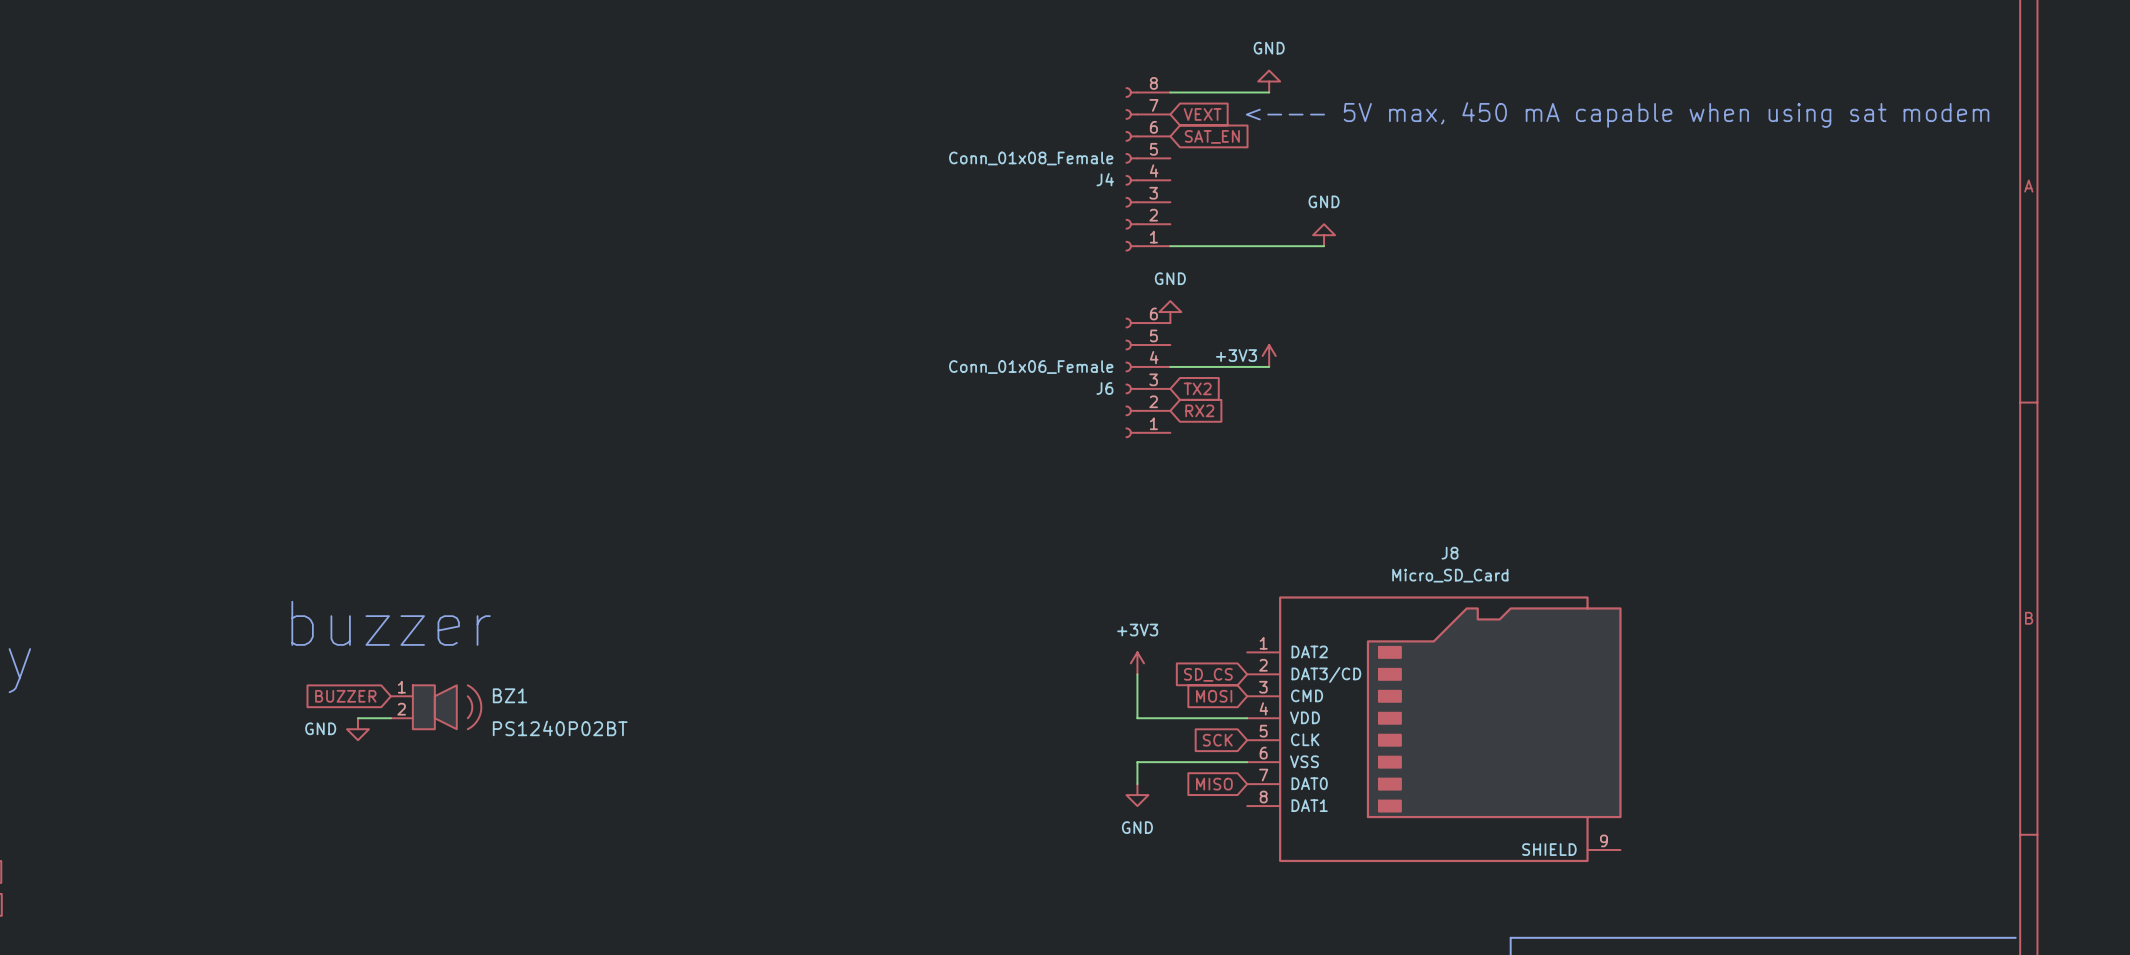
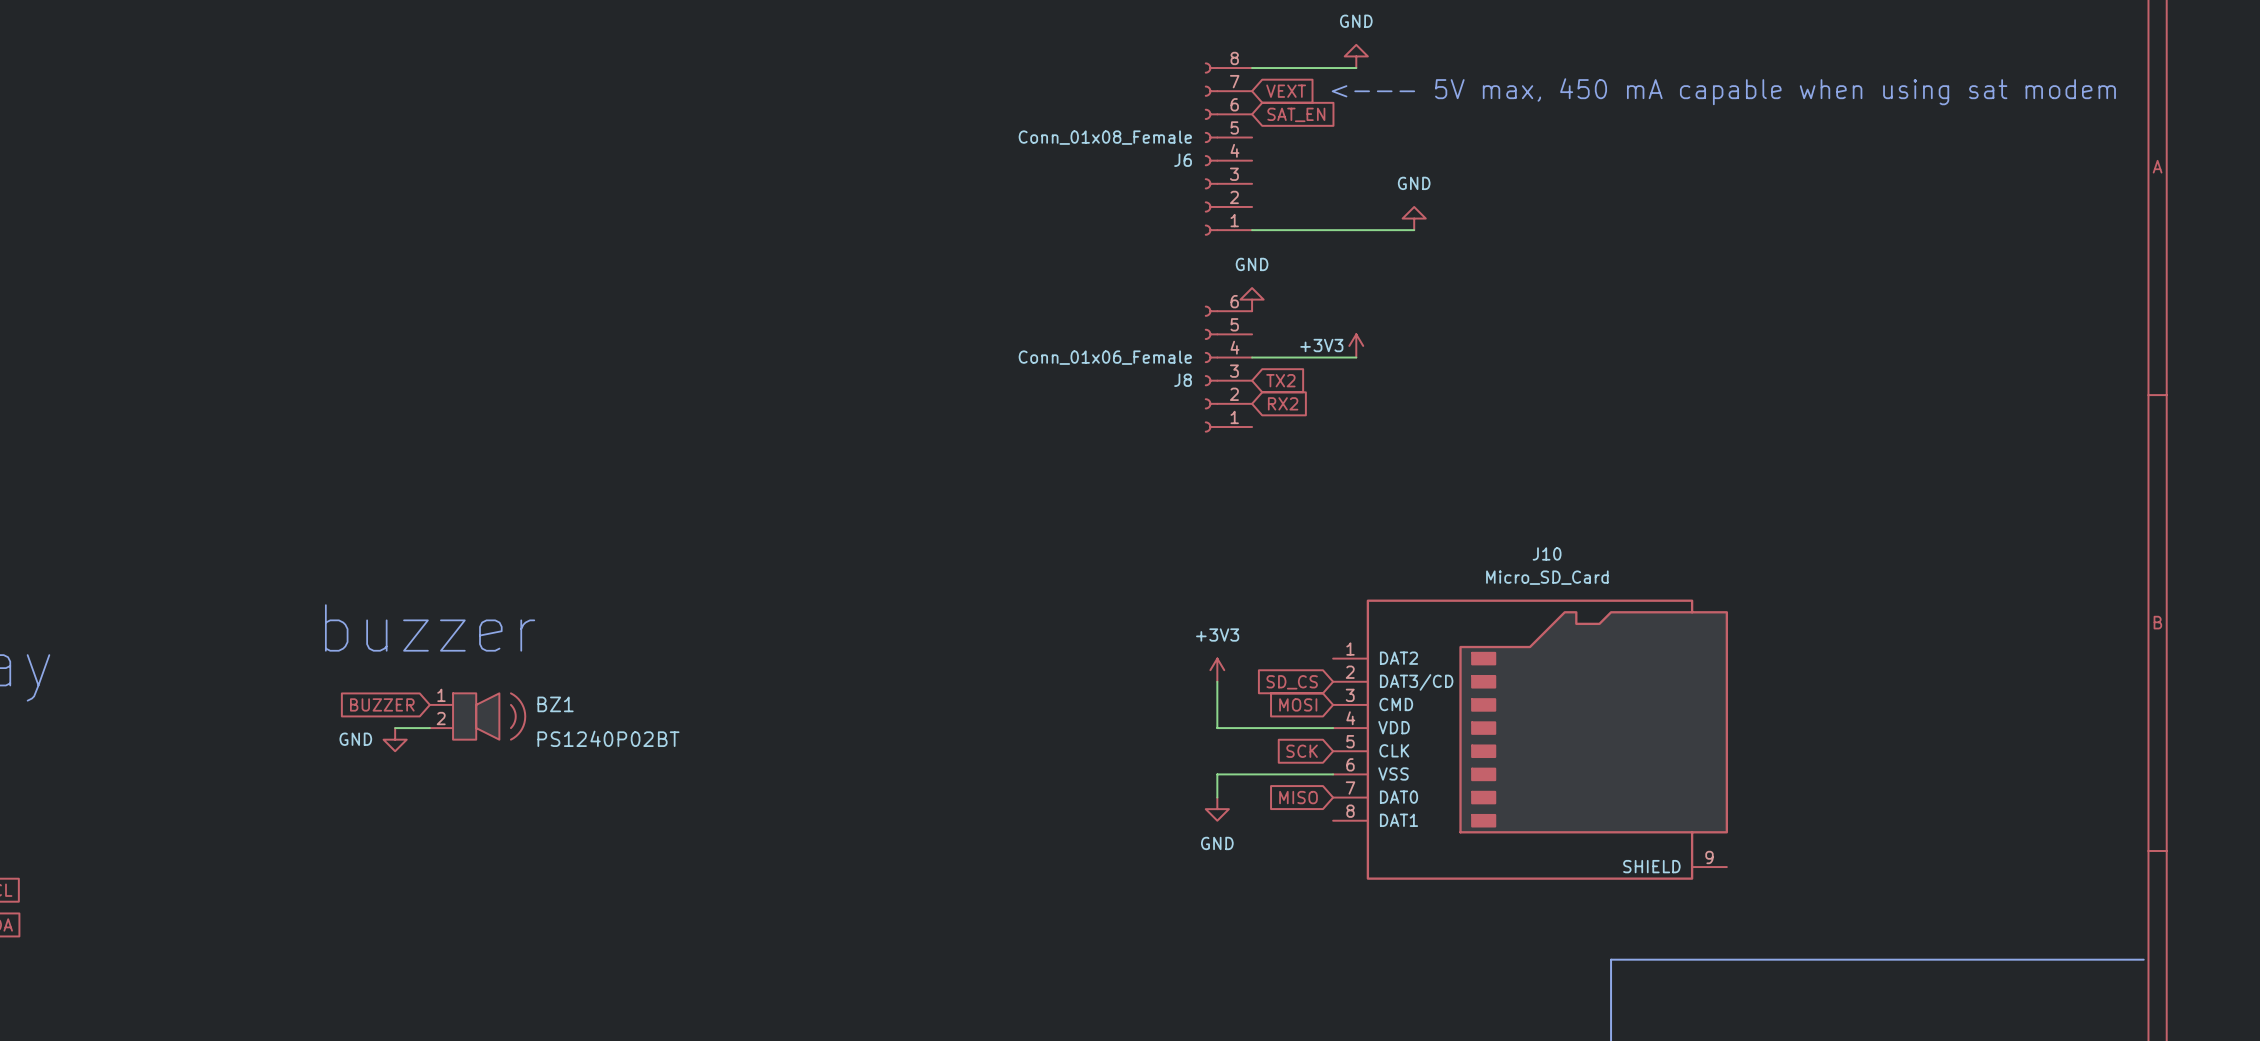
J4 name: J4 (1105, 179) -> J6 (1183, 160)
J6 name: J6 (1104, 388) -> J8 (1183, 380)
J8 name: J8 (1450, 553) -> J10 (1547, 553)

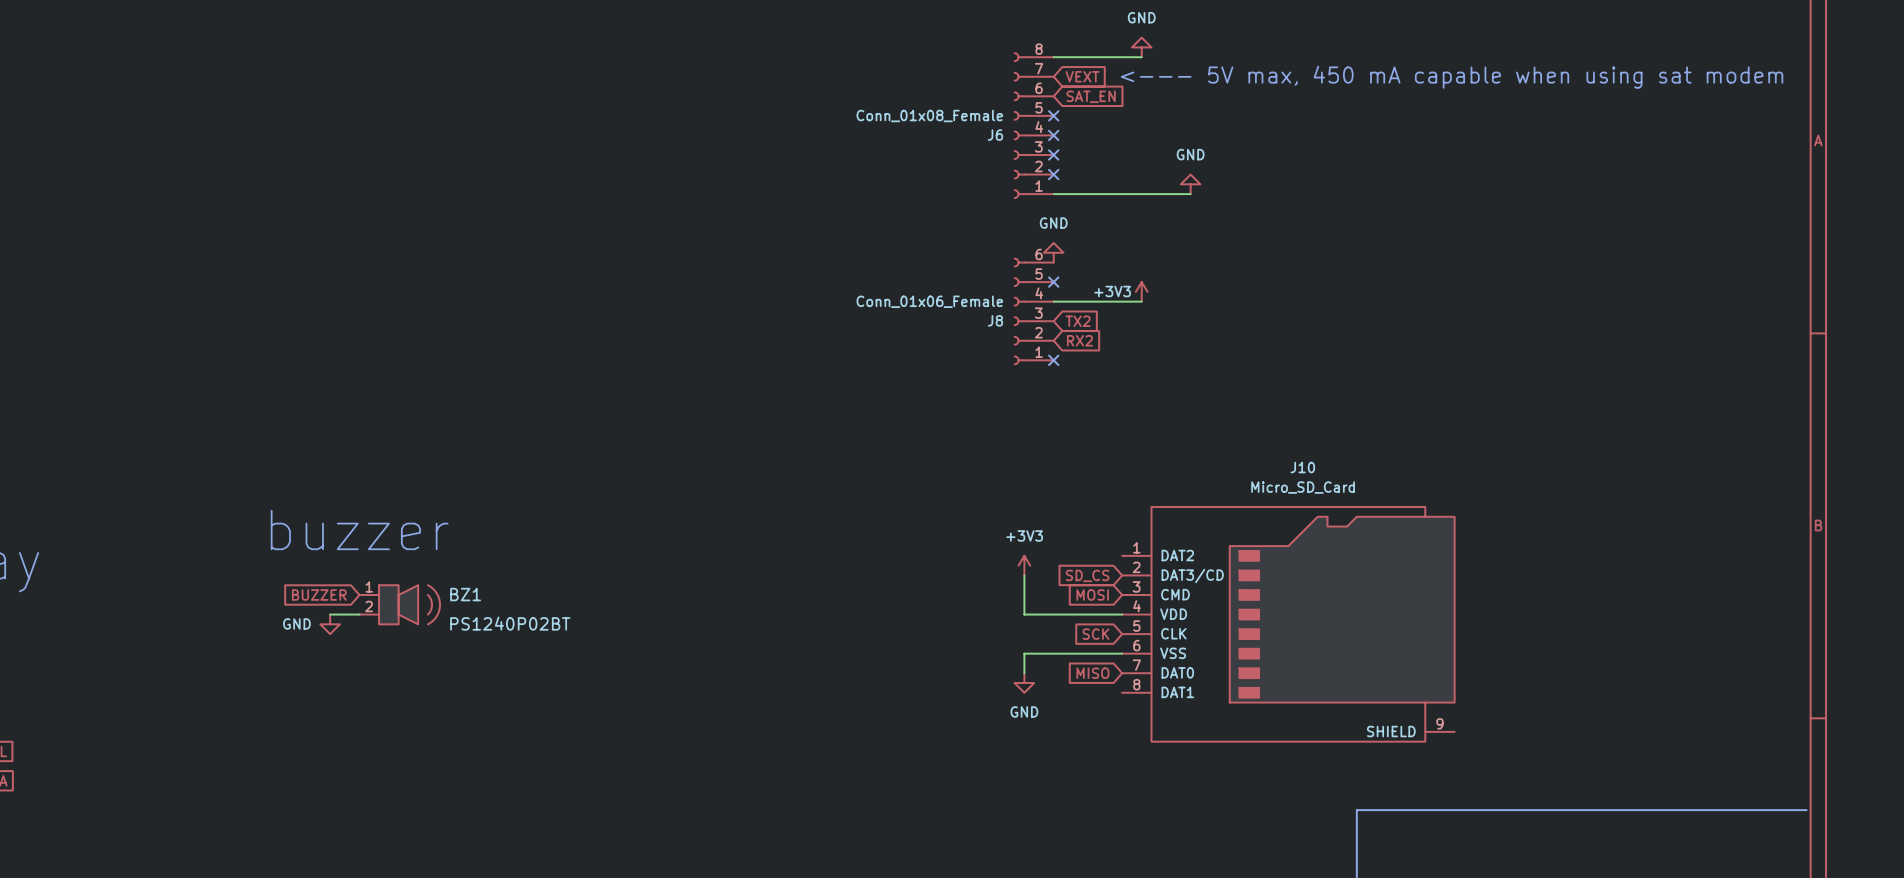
no-connect mark: none -> (1053, 115)
no-connect mark: none -> (1053, 135)
no-connect mark: none -> (1053, 154)
no-connect mark: none -> (1053, 174)
no-connect mark: none -> (1053, 282)
no-connect mark: none -> (1053, 360)

